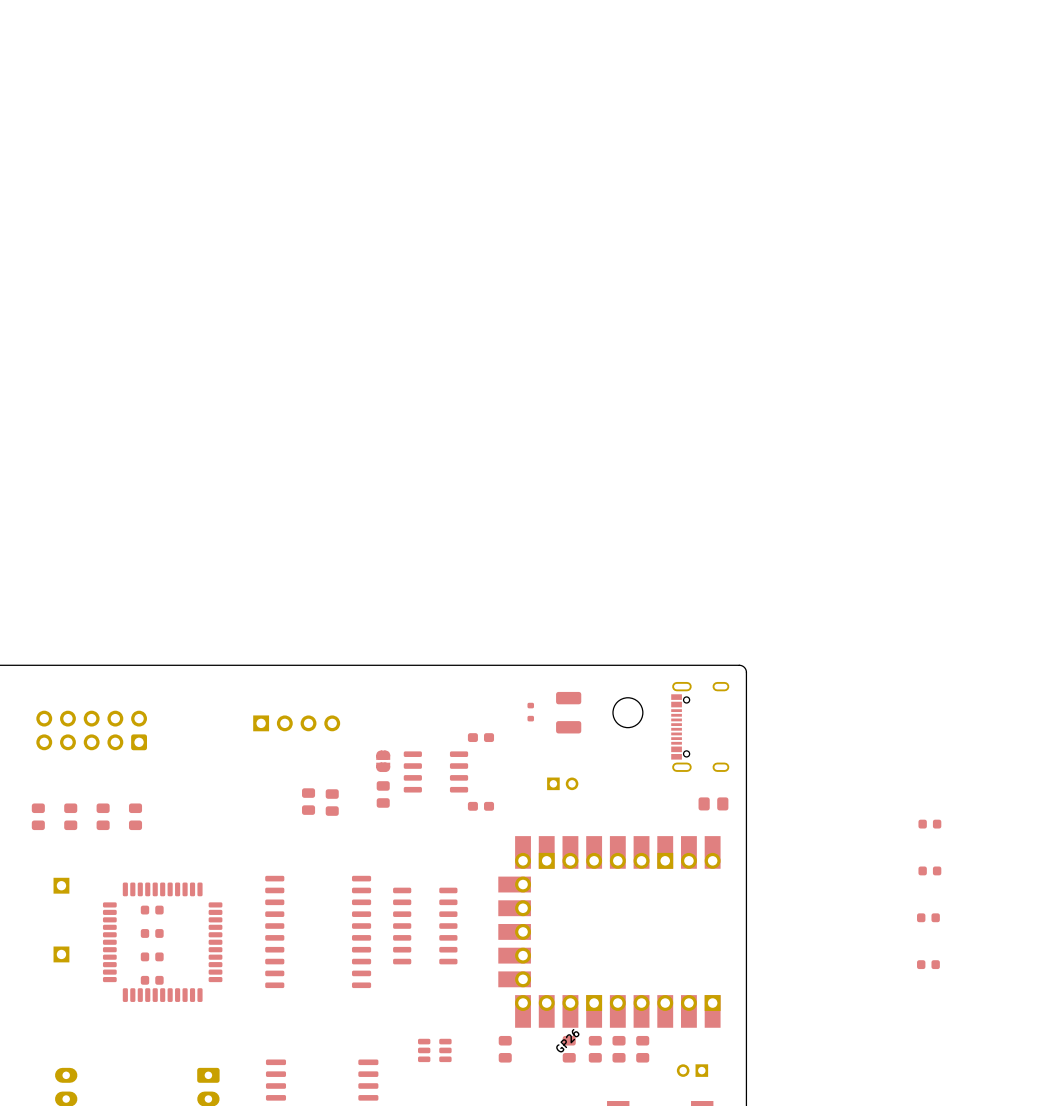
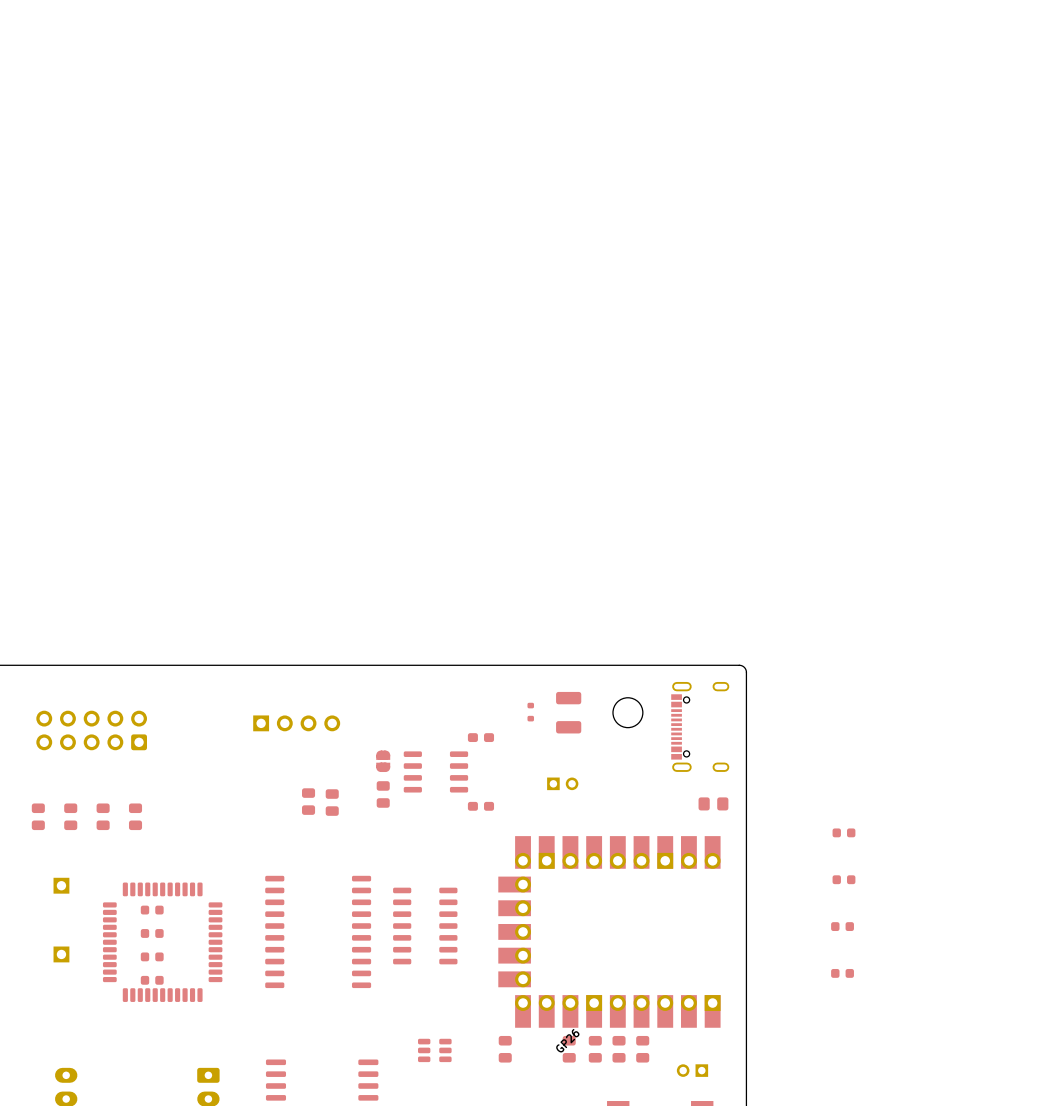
part: (929, 824) -> none
part: none -> (843, 832)
part: (929, 870) -> none
part: none -> (843, 879)
part: (928, 917) -> none
part: none -> (842, 926)
part: (928, 964) -> none
part: none -> (842, 973)

